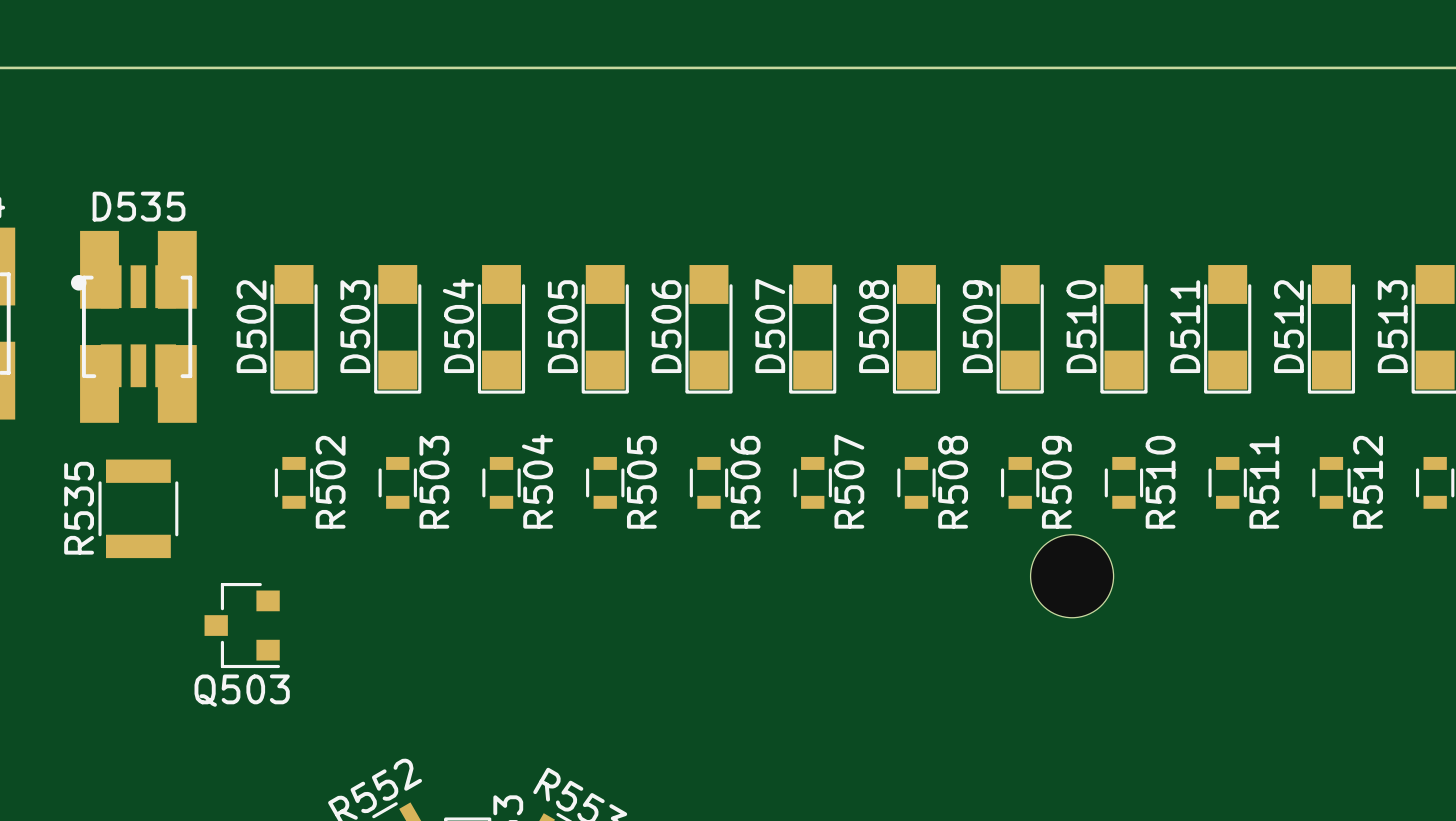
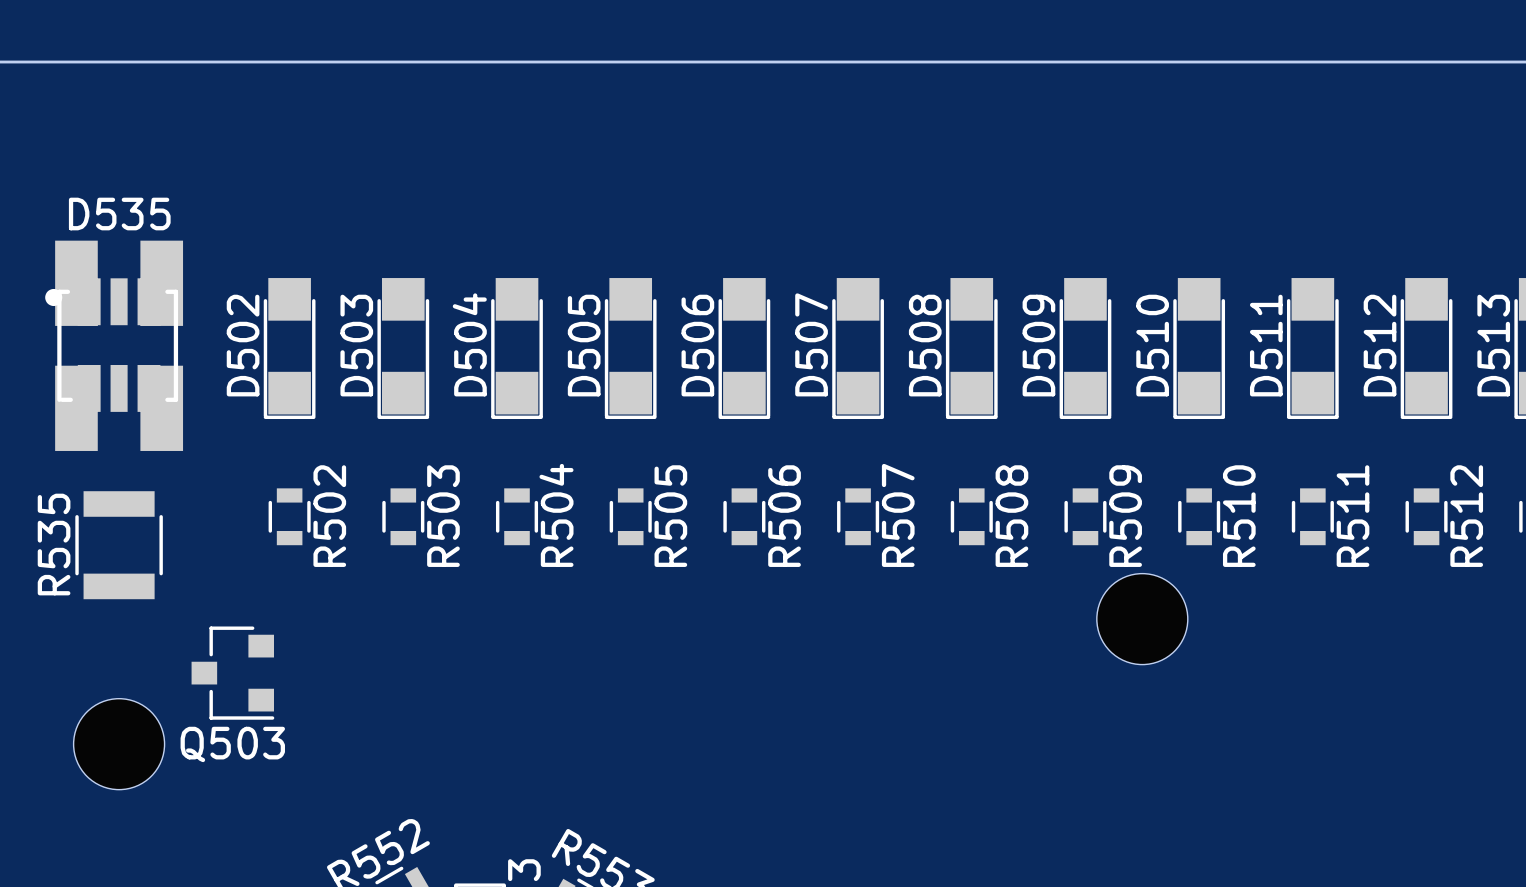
part: none -> (119, 744)

